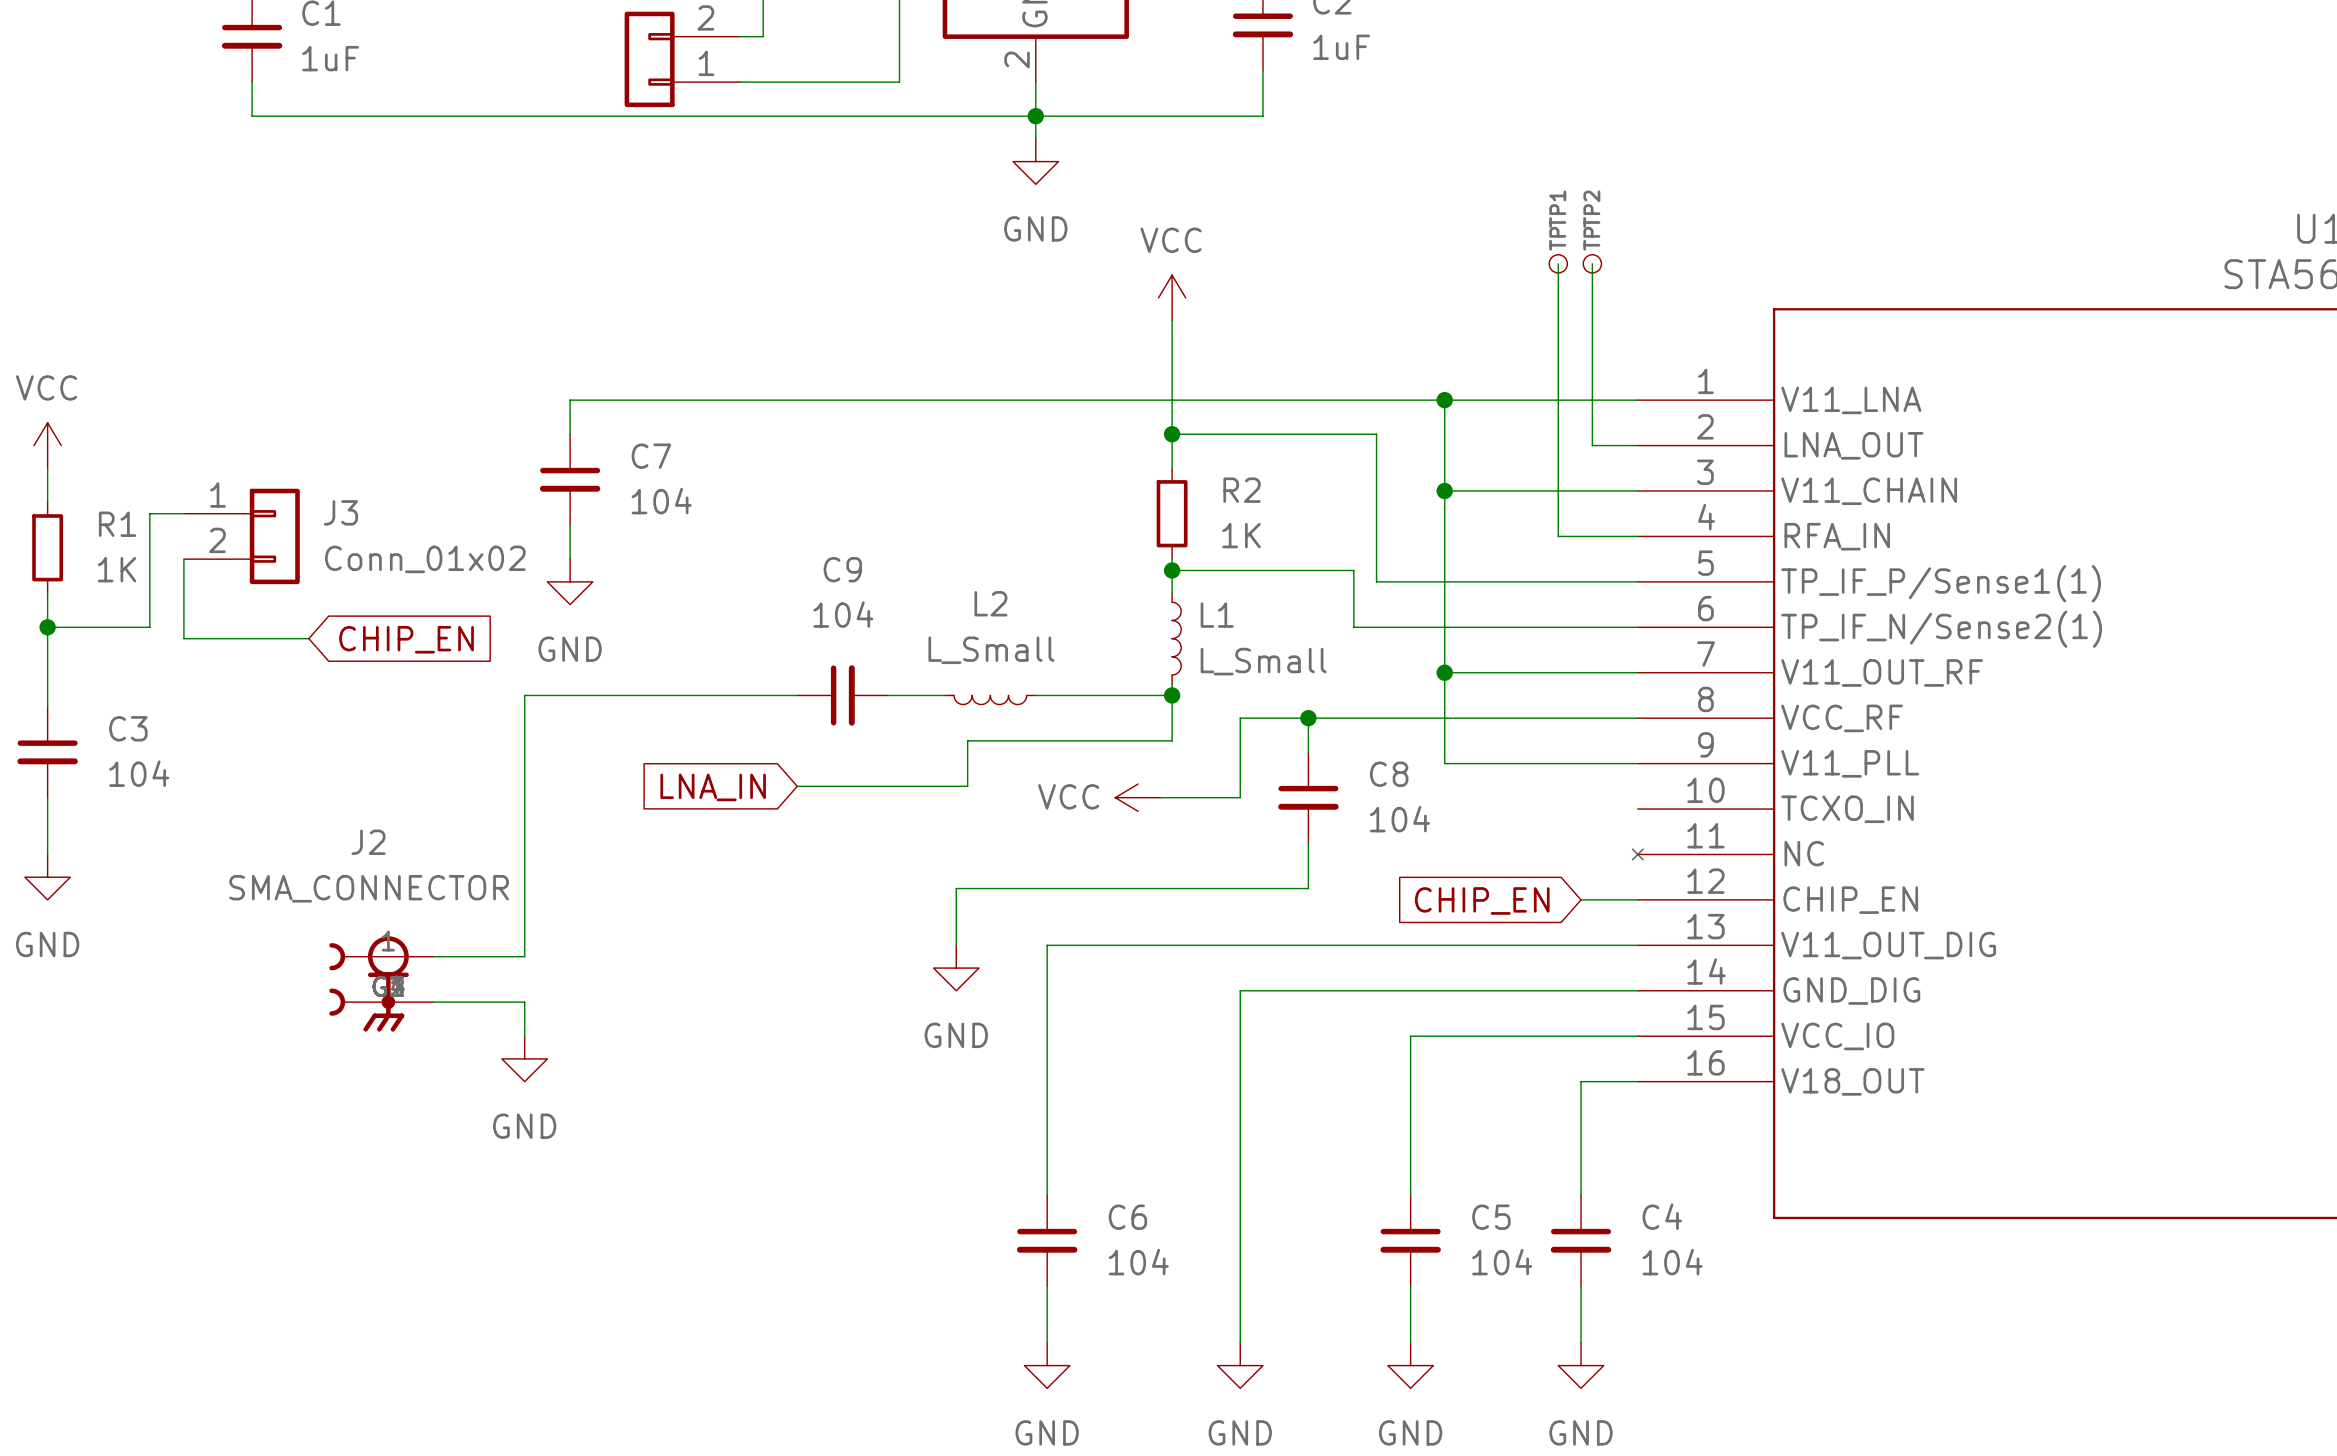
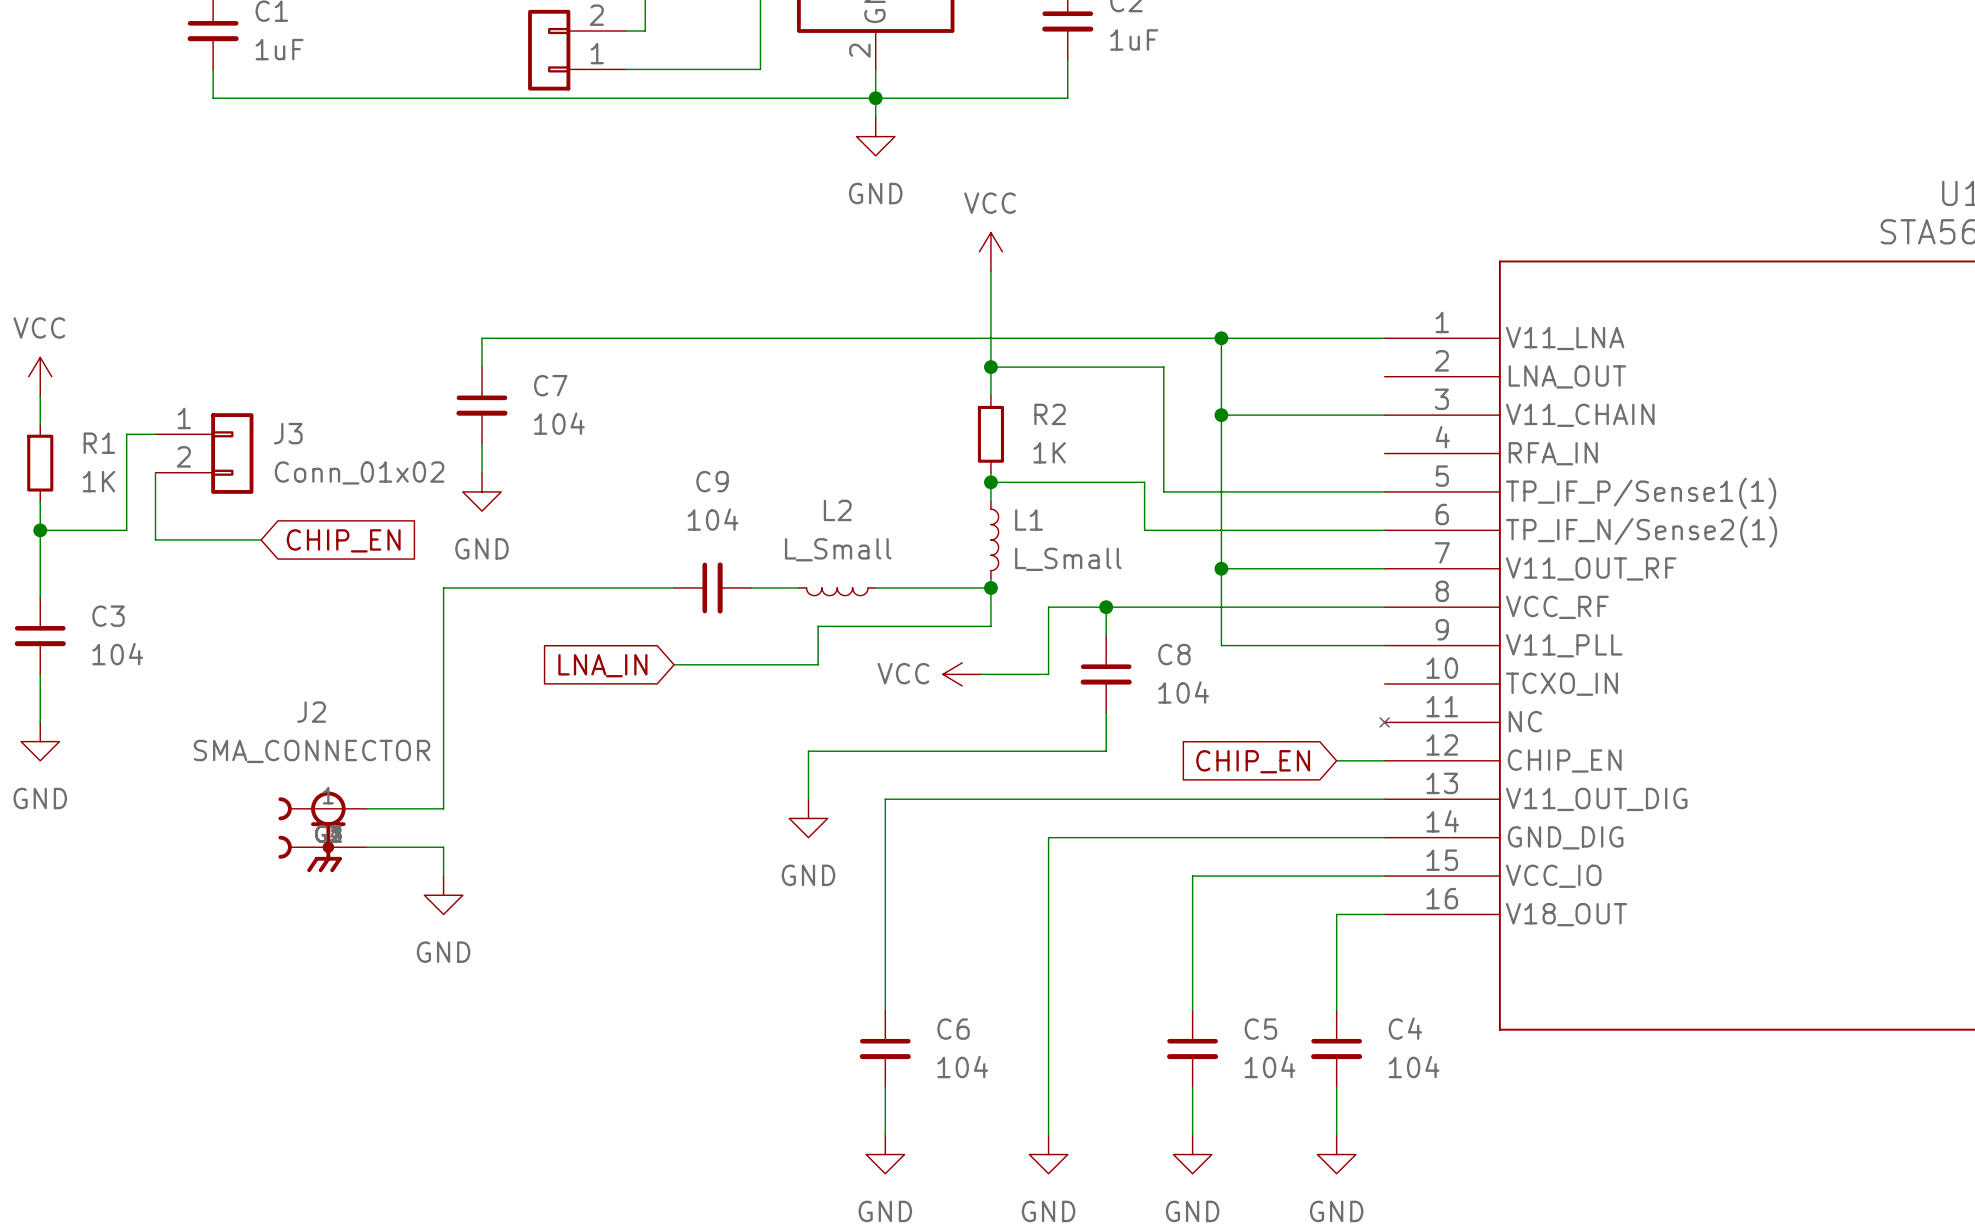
wire: (1558, 263) (1558, 536) (1637, 536) -> none
TP1: TP (1558, 263) -> none
wire: (1592, 263) (1592, 445) (1637, 445) -> none
TP2: TP (1592, 263) -> none

